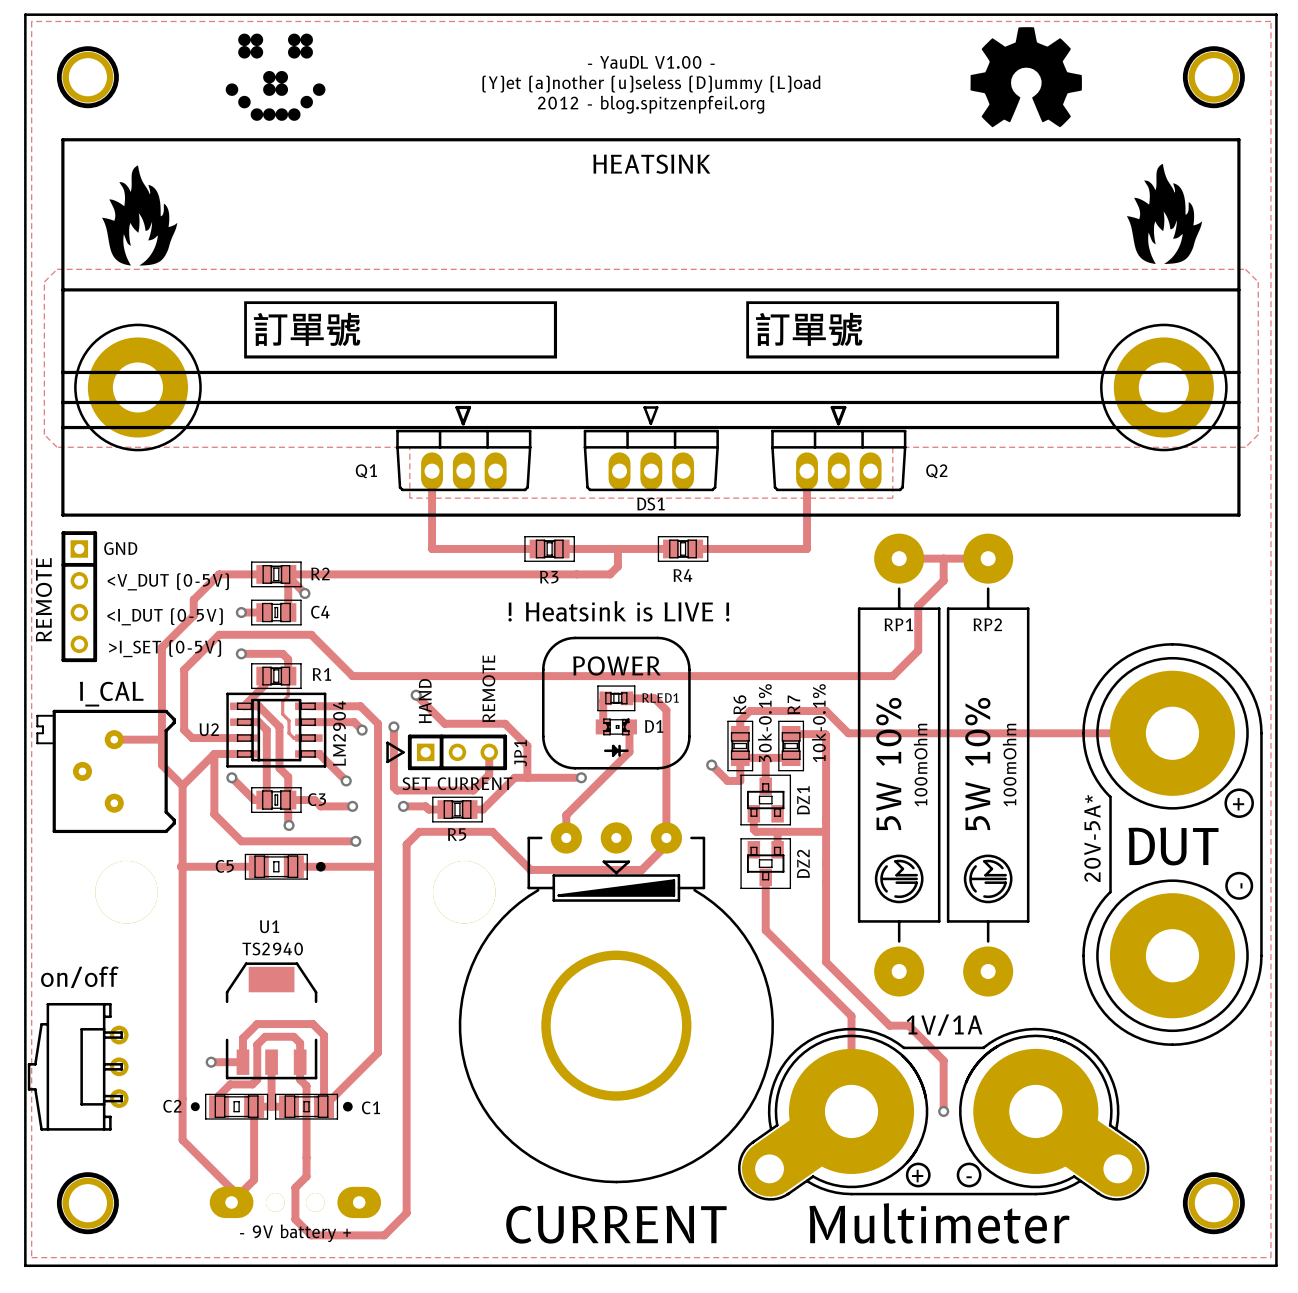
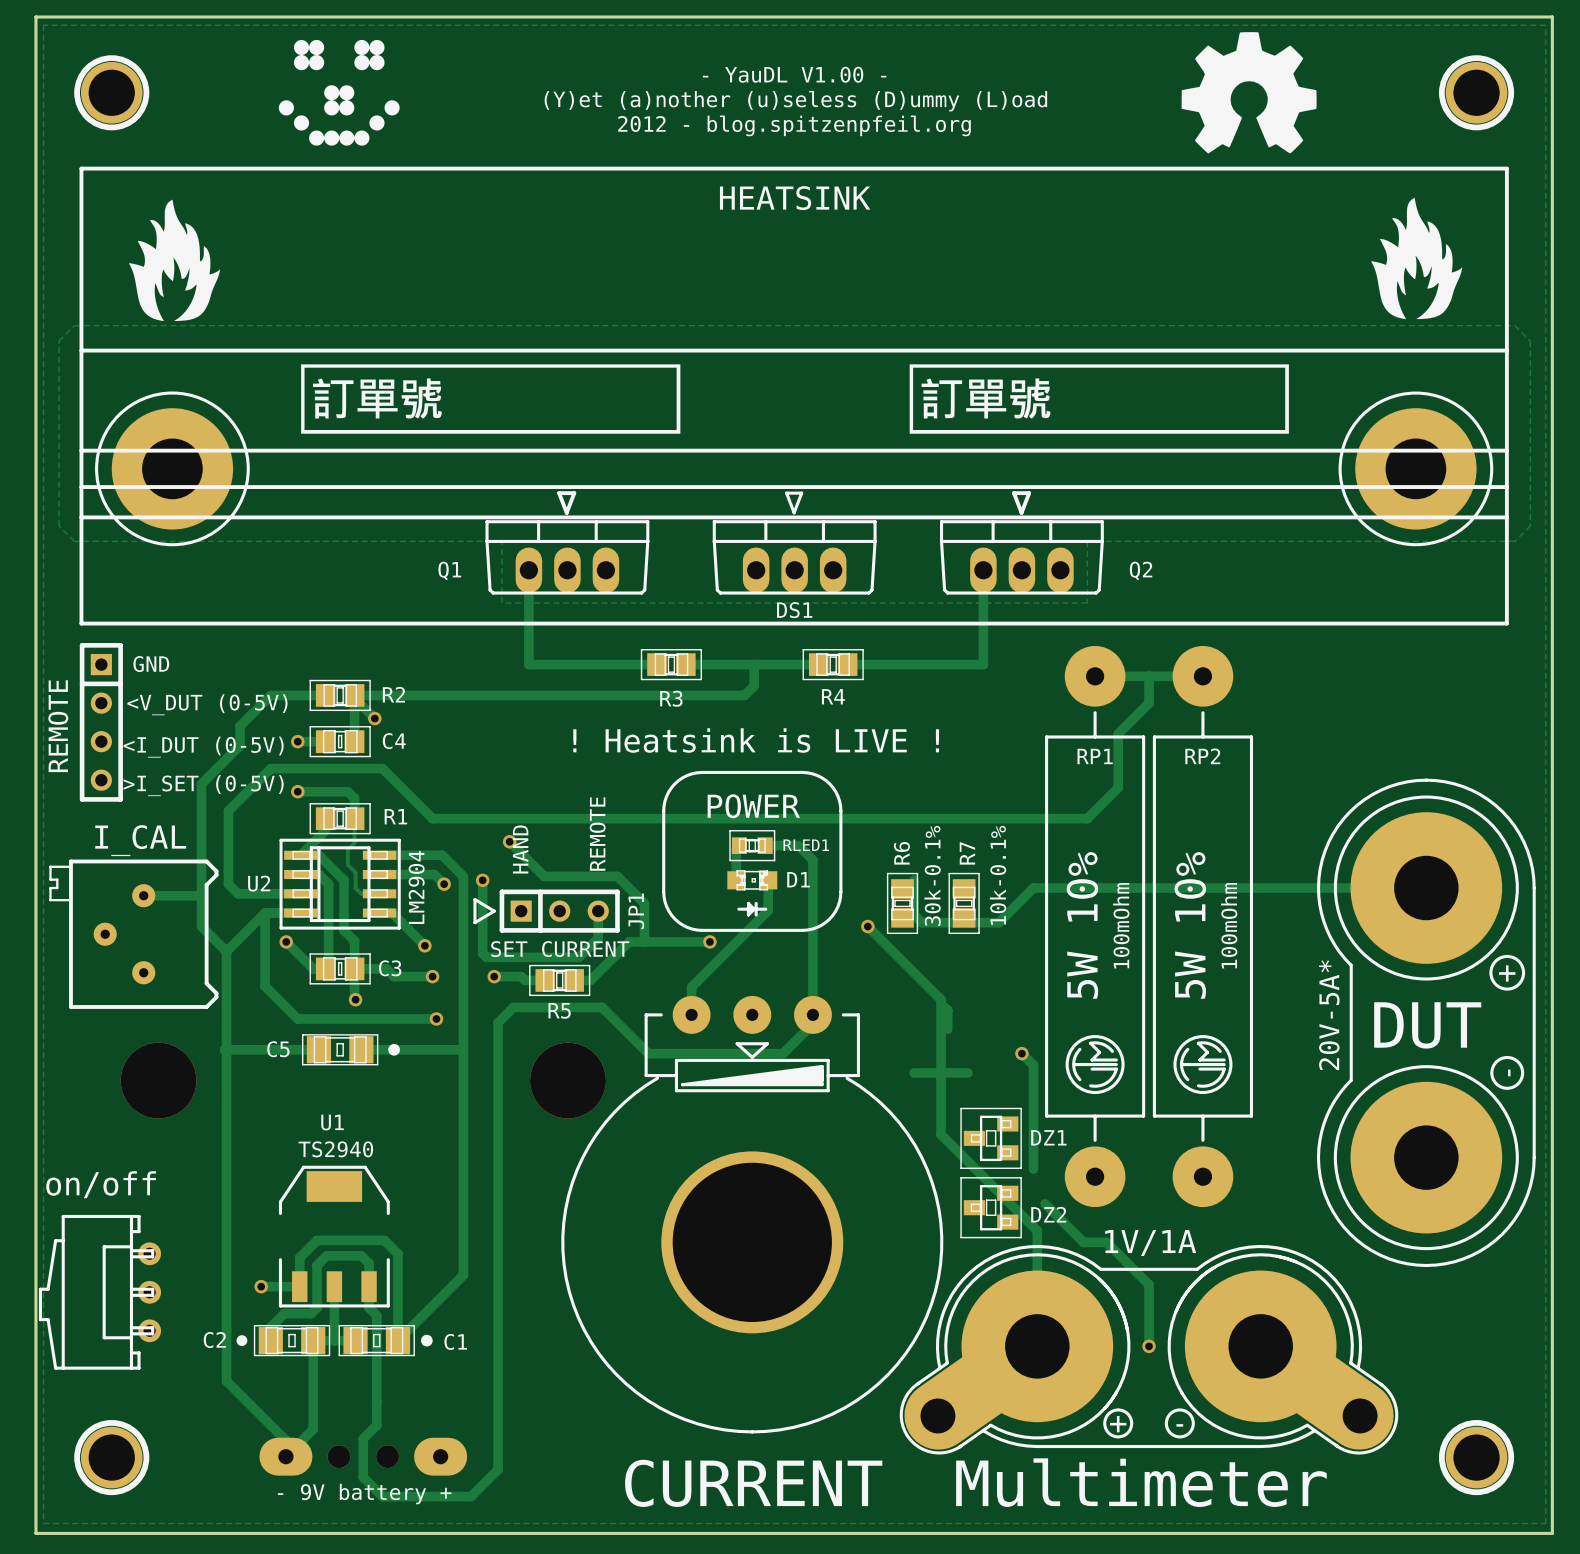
track: (848, 733) (826, 711) (749, 711) (740, 720) (740, 734) -> (1033, 888) (998, 922) (921, 922) (914, 914) (914, 880)
track: (791, 734) (826, 734) (826, 962) (857, 993) -> none
track: (765, 757) (765, 786) -> none
track: (791, 757) (740, 757) (740, 780) (727, 780) -> none
DZ1 rotation: 0° (765, 800) -> 90° counterclockwise (991, 1138)
DZ1 position: (765, 800) -> (991, 1138)
track: (753, 813) (753, 829) (756, 831) (826, 831) -> none
DZ2 rotation: 0° (765, 863) -> 90° clockwise (991, 1207)
DZ2 position: (765, 863) -> (991, 1207)
track: none -> (1021, 1053) (1033, 1065) (1033, 1169)
via: none -> (1021, 1053)
track: (765, 877) (765, 930) (772, 936) -> (887, 945) (941, 999) (941, 1134)
track: none -> (914, 1072) (967, 1072)

